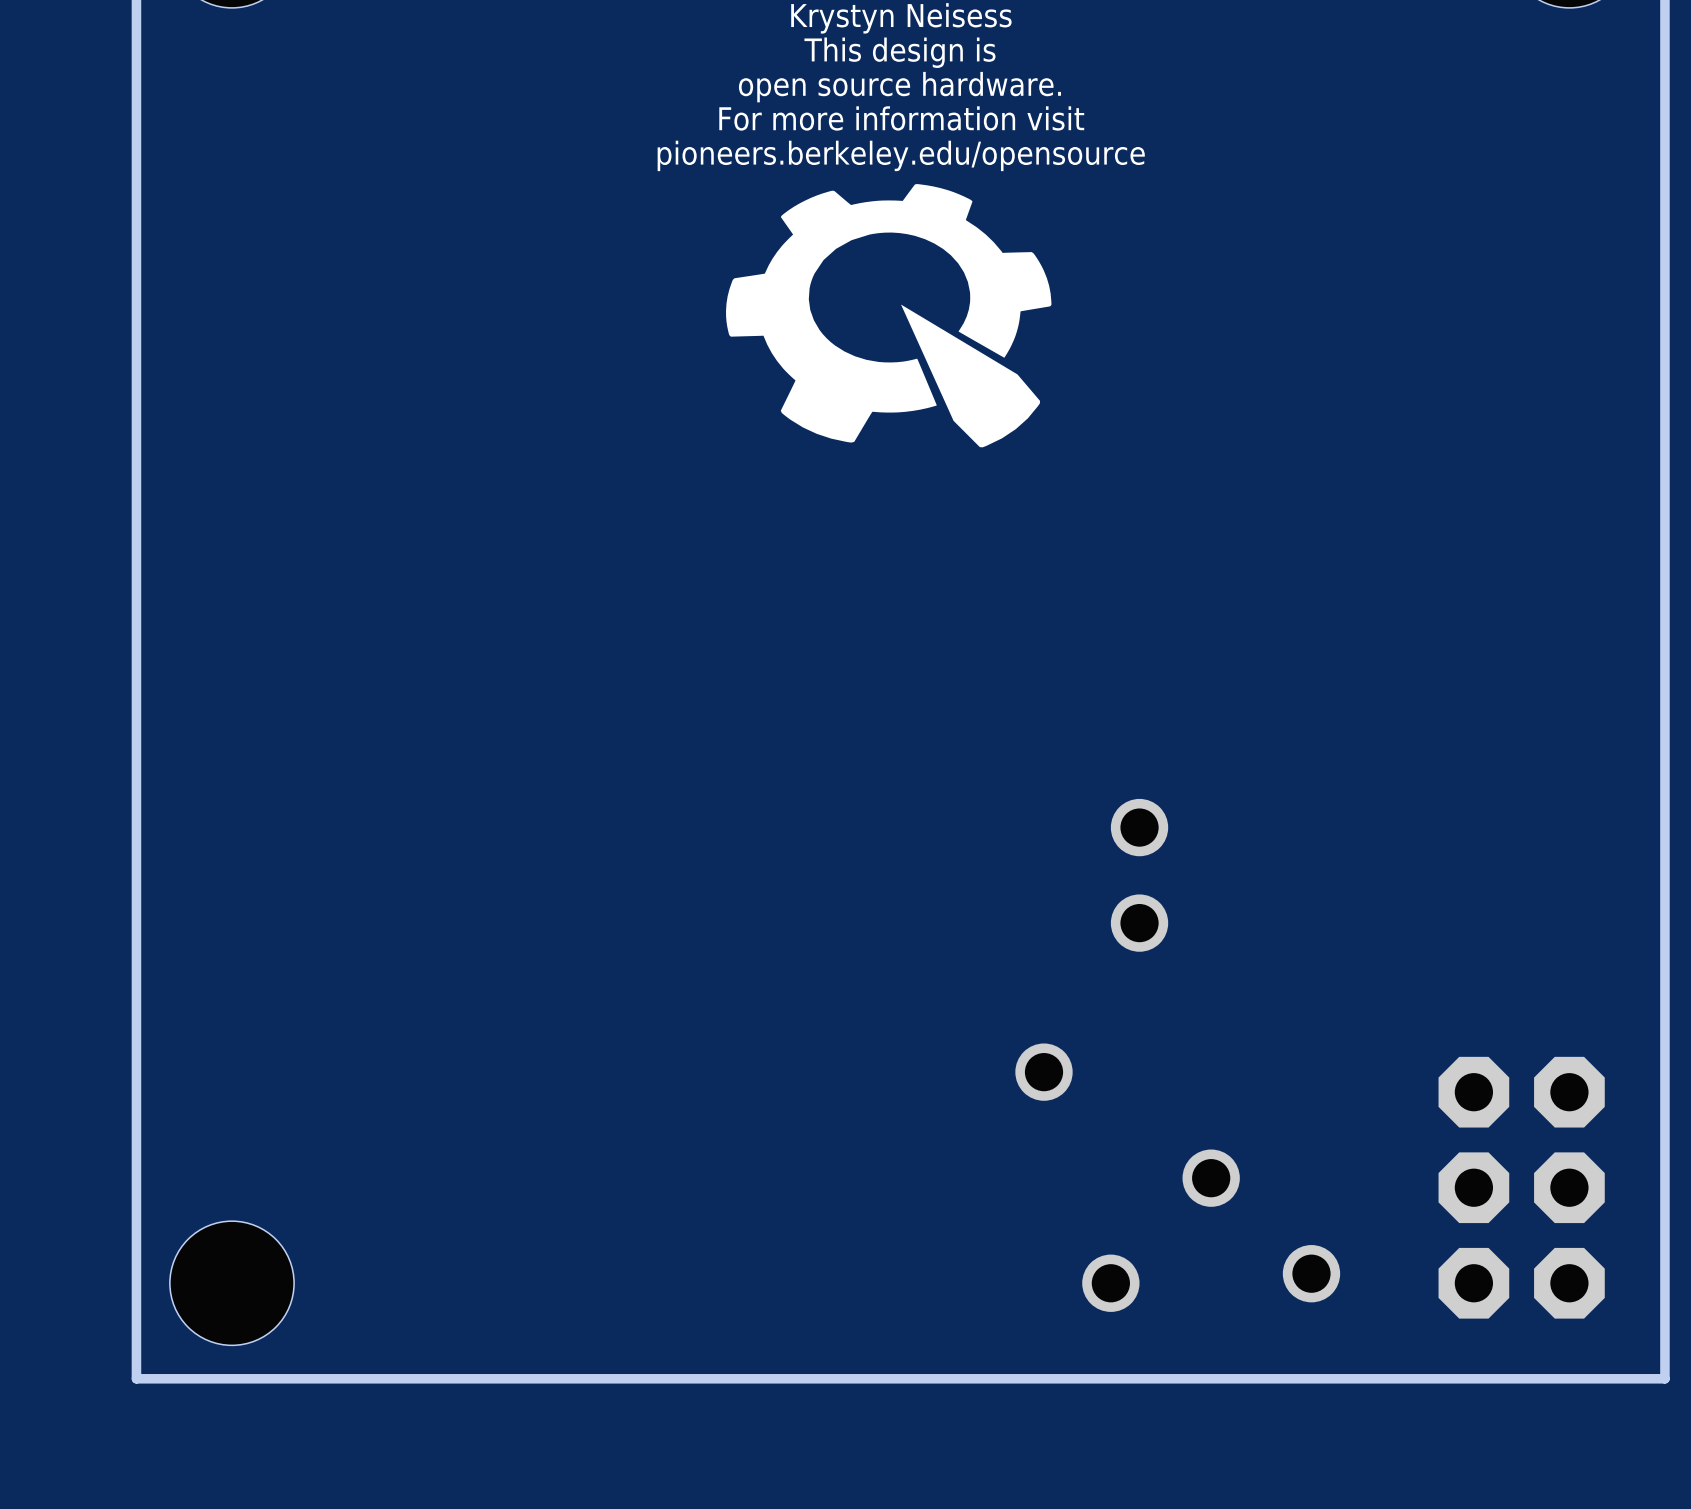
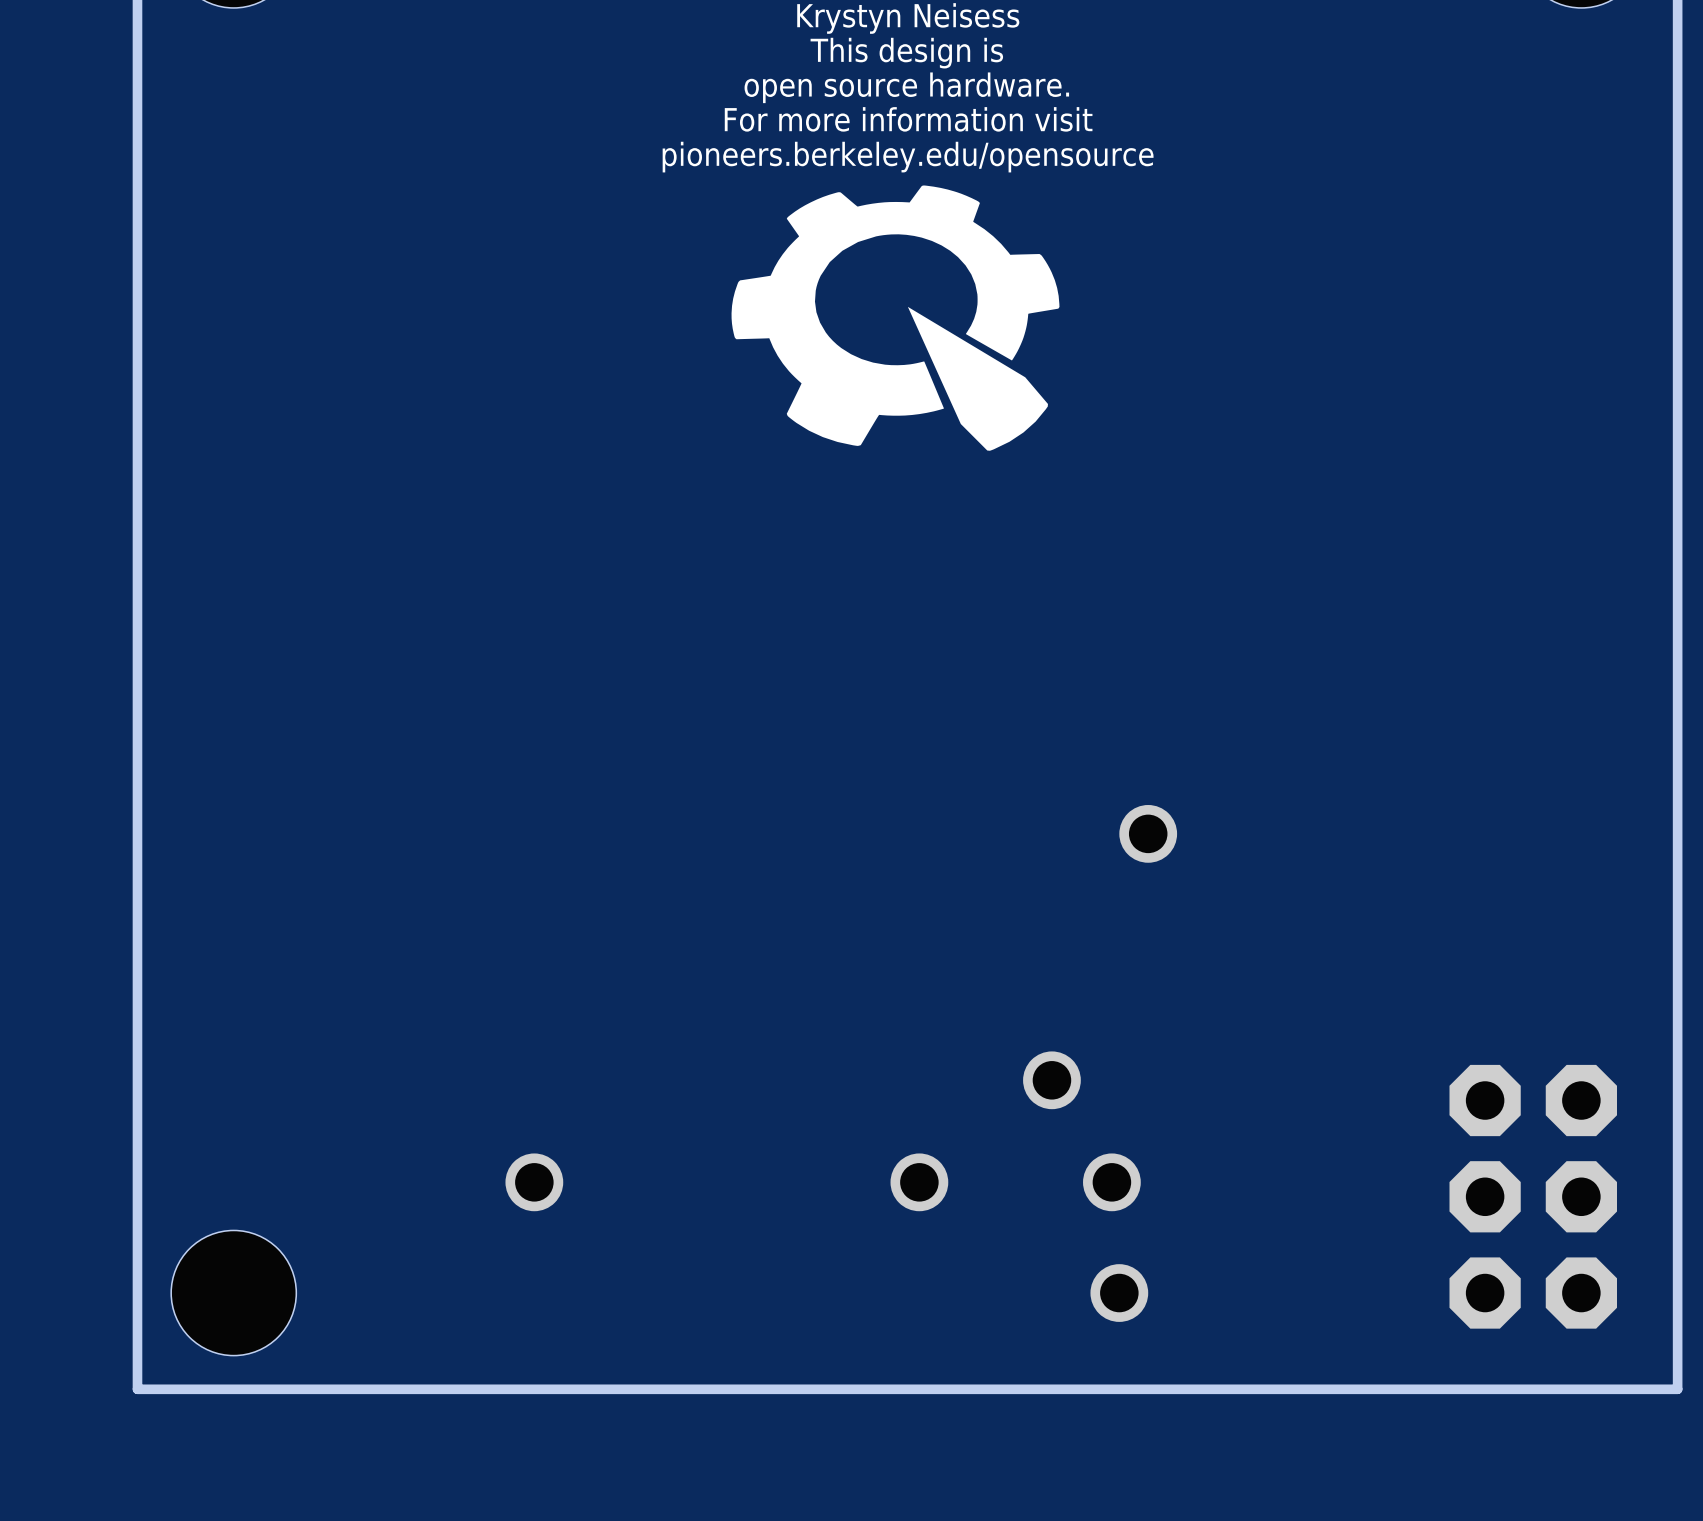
part: (1139, 923) -> none
part: none -> (534, 1182)
part: none -> (919, 1182)
part position: (1211, 1178) -> (1111, 1182)
part: (1311, 1273) -> none

